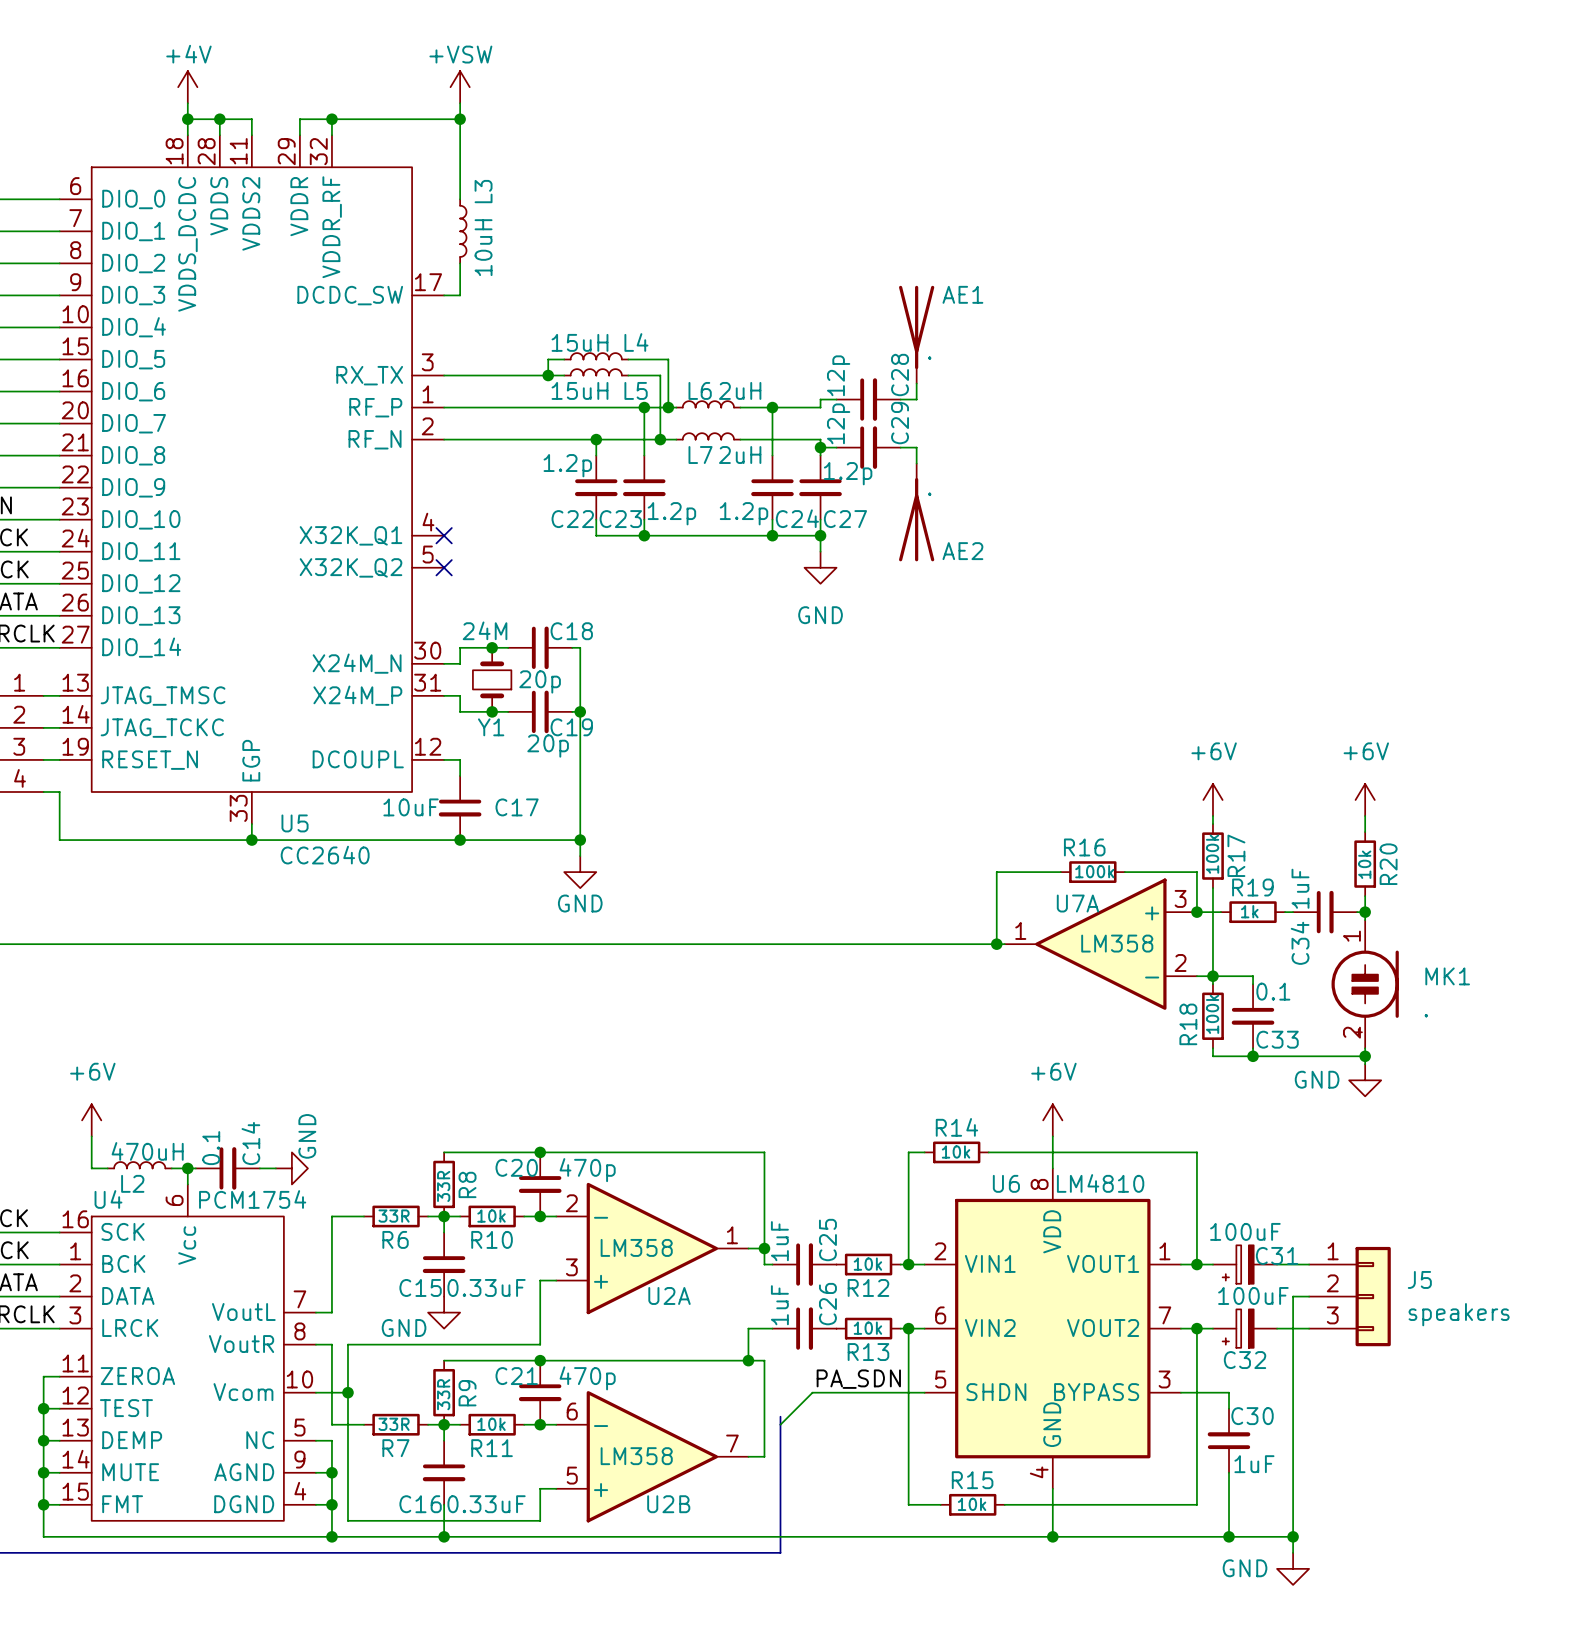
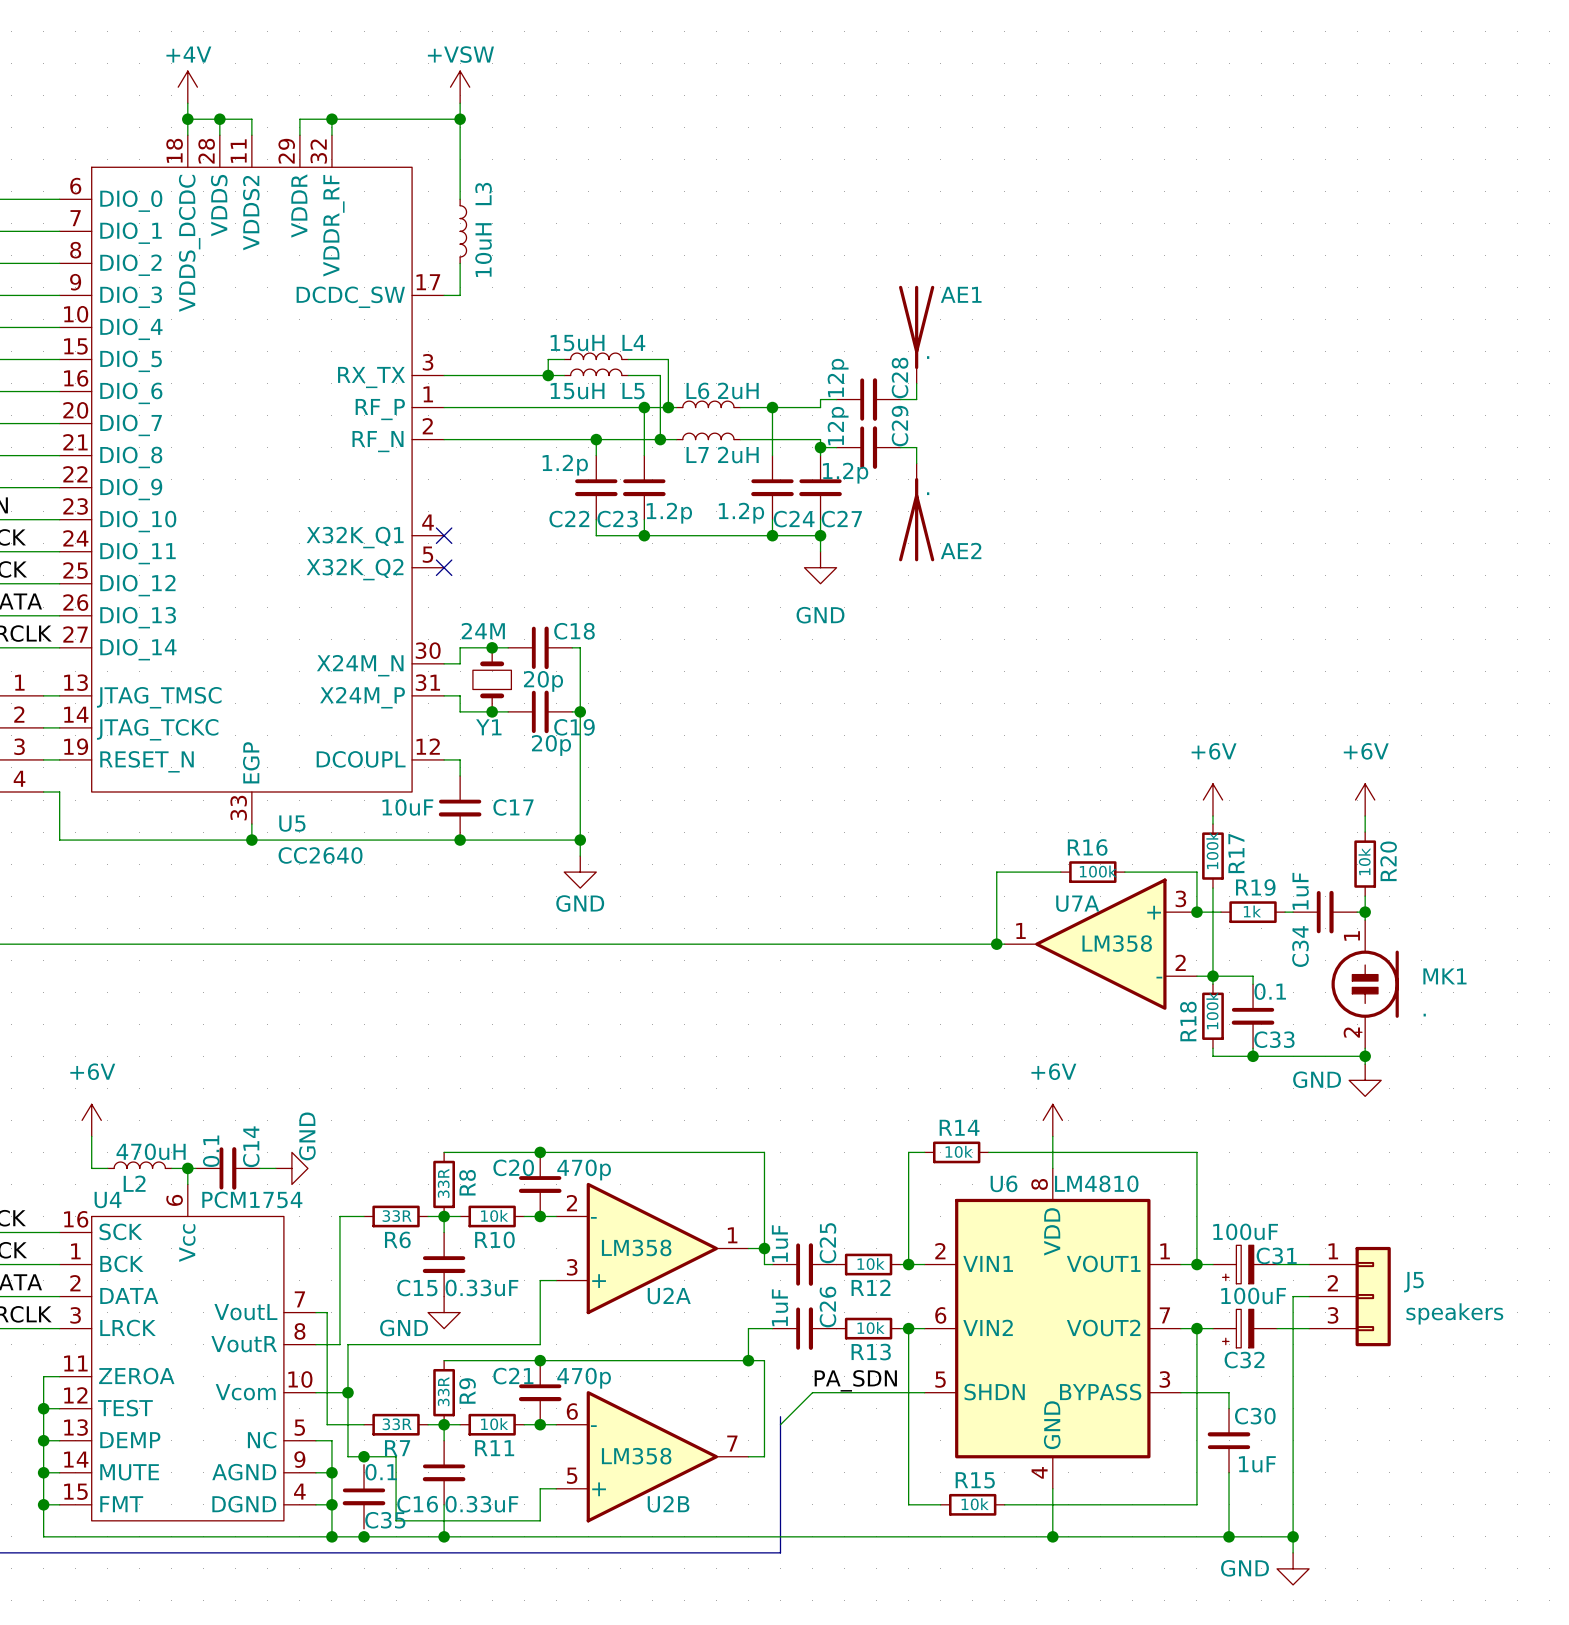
wire: (339, 1216) (331, 1216) (331, 1312) (327, 1312) -> (339, 1216) (339, 1344) (331, 1344)
wire: (331, 1344) (331, 1424) -> (327, 1312) (327, 1424) (331, 1424)
wire: (347, 1456) (347, 1520) (396, 1520) -> (347, 1456) (396, 1456) (396, 1520)
junction: none -> (364, 1456)
C35: none -> 0.1 (364, 1496)
junction: none -> (364, 1536)

